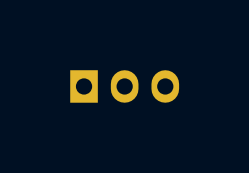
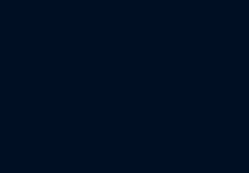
part: (124, 86) -> none

